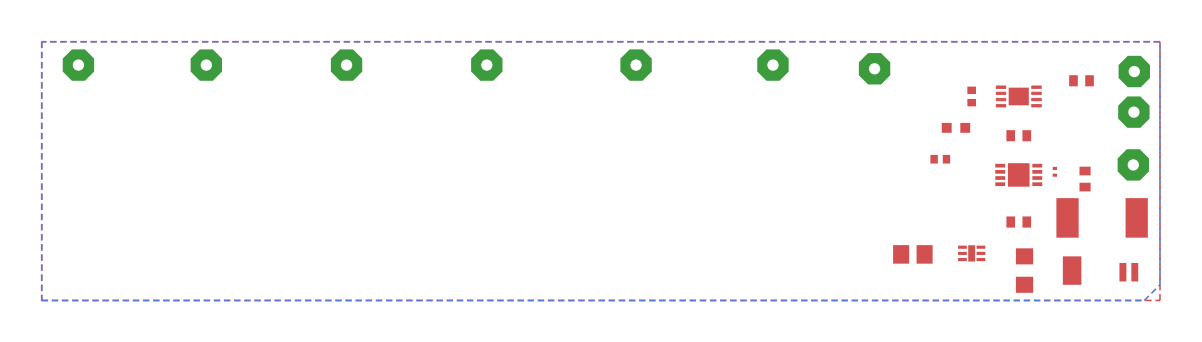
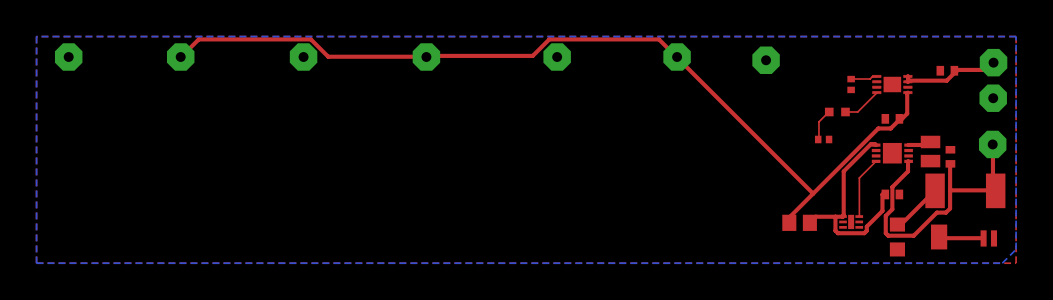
top track: none -> (180, 57) (198, 39) (310, 39) (328, 56) (426, 57) (532, 55) (549, 39) (658, 39) (813, 193)
top track: none -> (993, 62) (986, 69) (956, 70)
top track: none -> (956, 70) (946, 80) (907, 81) (908, 76)
top track: none -> (876, 76) (870, 79) (851, 79)
top track: none -> (876, 92) (857, 111) (845, 111)
top track: none -> (907, 92) (907, 113) (890, 128) (878, 128) (790, 216) (789, 222)
top track: none -> (829, 111) (818, 121) (818, 139)
top track: none -> (930, 141) (927, 144) (908, 145)
top track: none -> (992, 144) (992, 188) (995, 190) (950, 190)
top track: none -> (876, 145) (870, 144) (843, 171) (842, 216)
part footprint: [1052, 166, 1058, 177] -> [920, 135, 941, 168]
top track: none -> (876, 161) (859, 177) (859, 216)
top track: none -> (908, 161) (908, 171) (892, 187) (892, 209) (885, 215) (885, 233) (888, 235) (913, 235) (936, 212) (945, 212) (950, 208) (950, 166)
top track: none -> (935, 190) (901, 224) (897, 224)
top track: none -> (882, 194) (882, 210) (866, 226) (864, 233) (837, 233) (835, 230) (835, 216)
top track: none -> (842, 216) (815, 216) (809, 222)
top track: none -> (939, 237) (983, 238)

